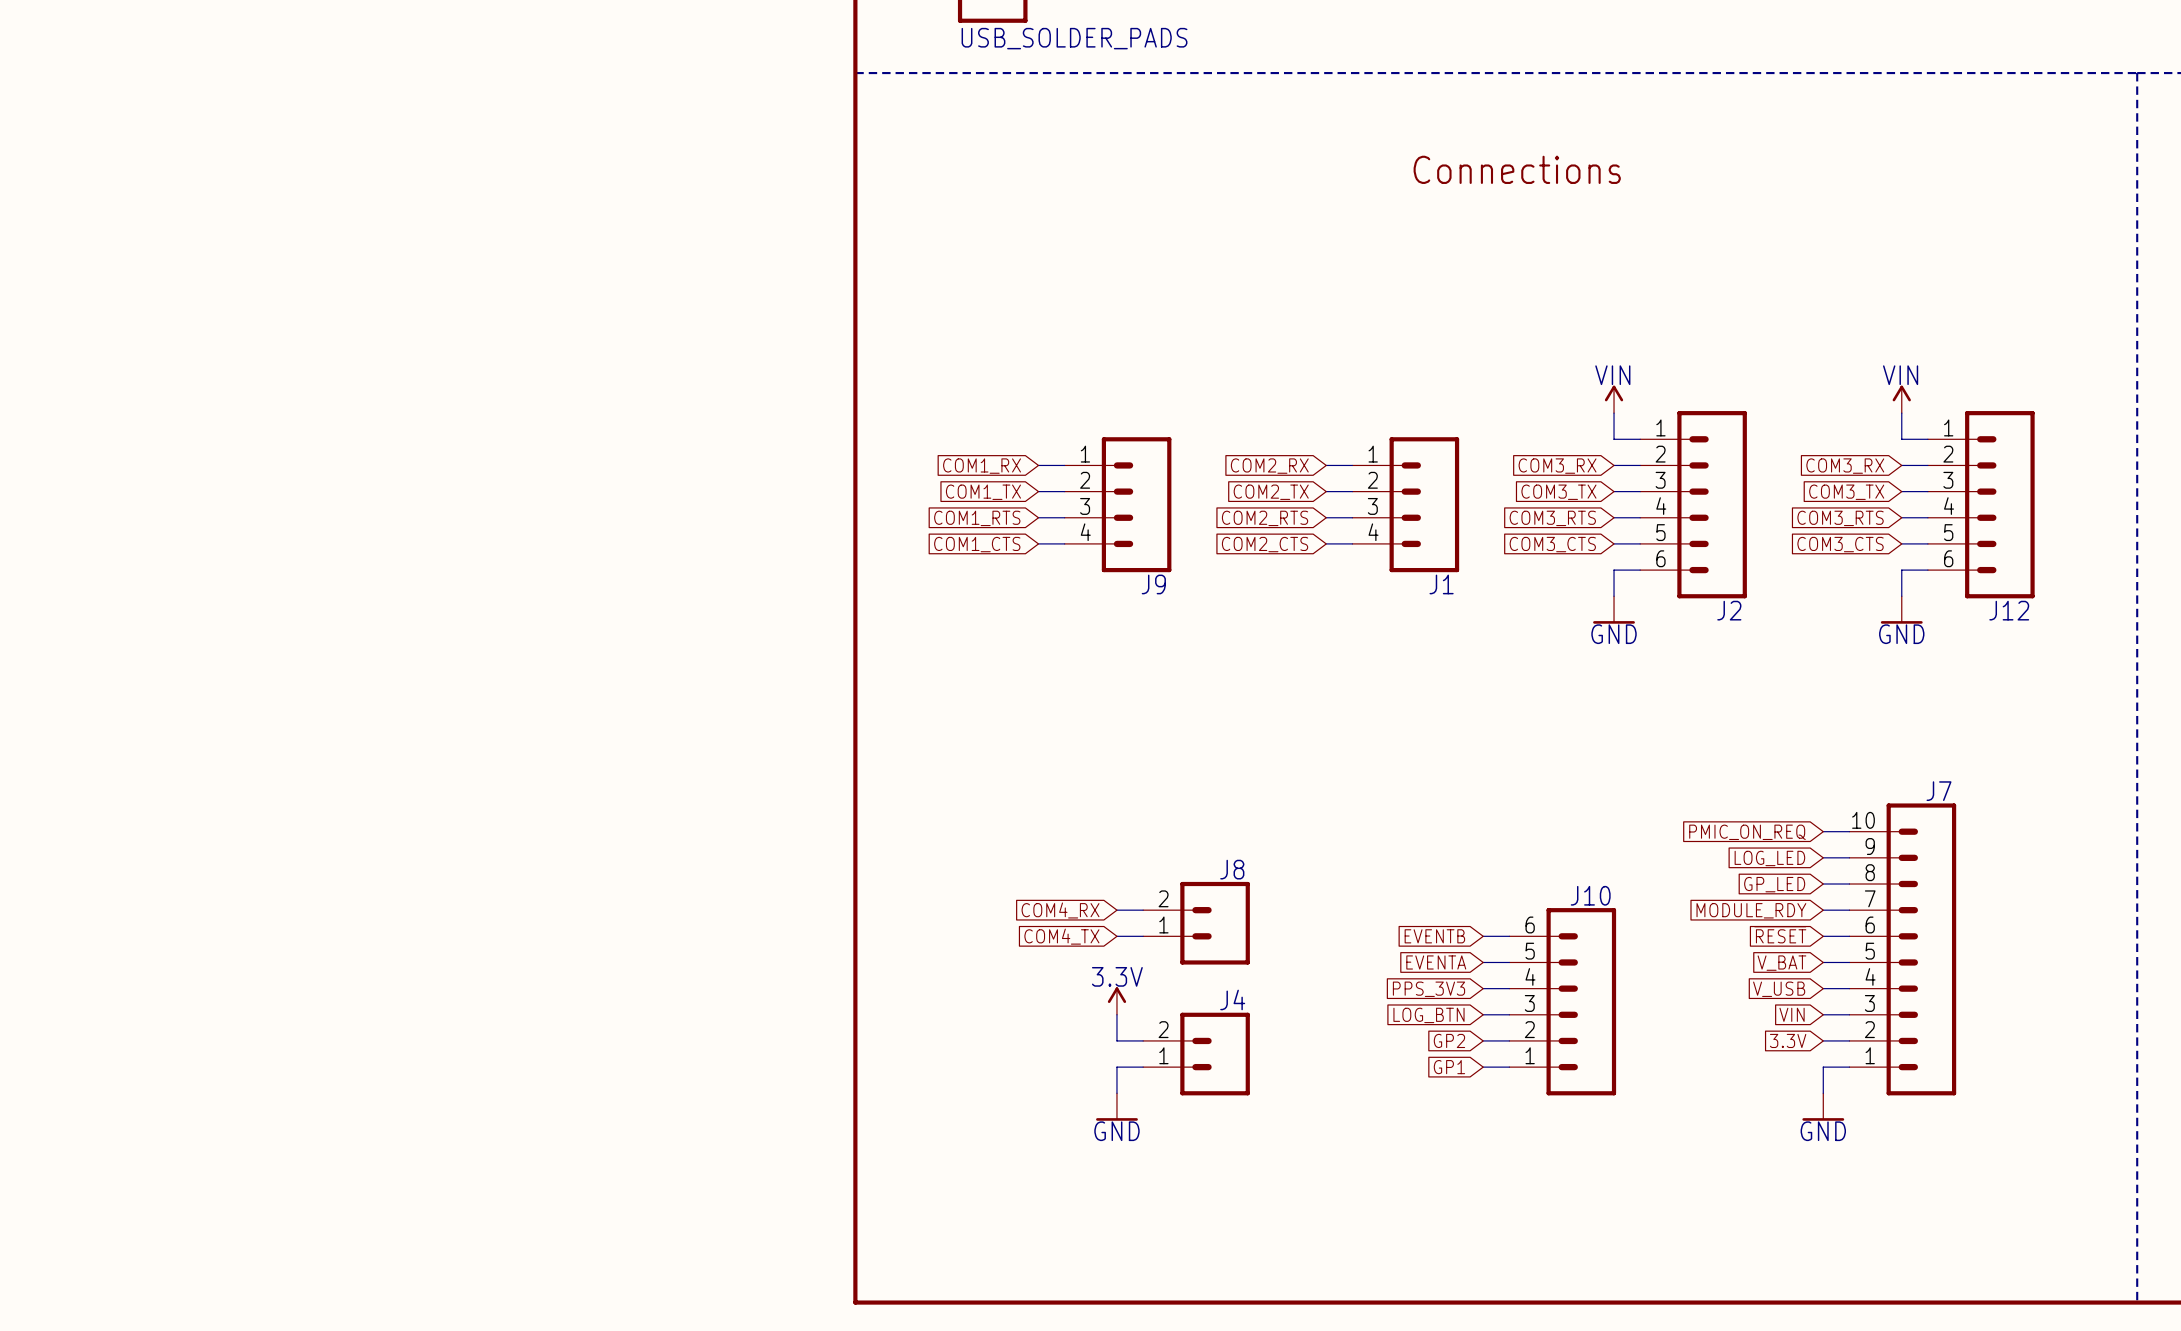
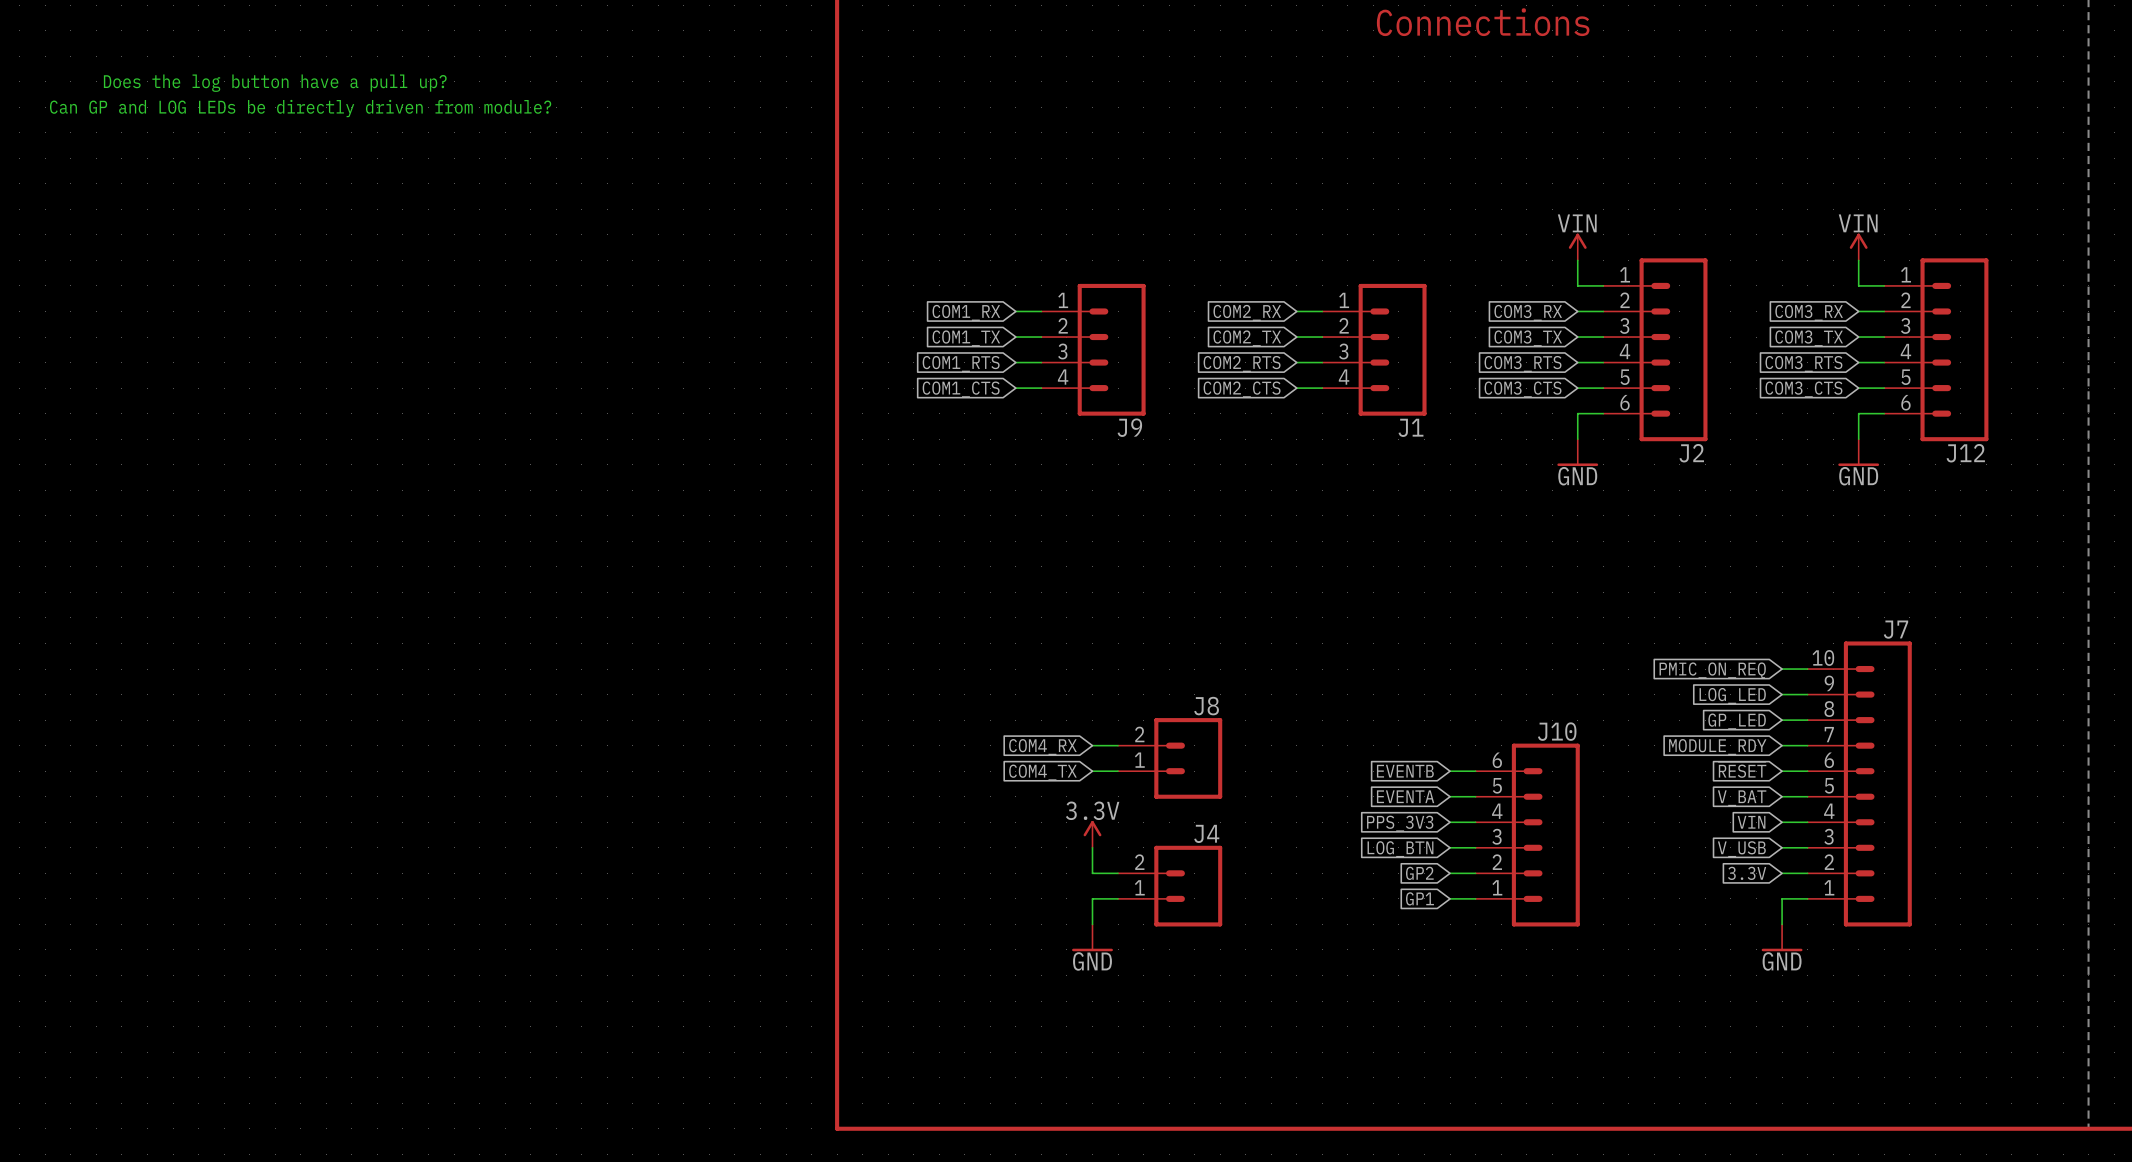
text: none -> Does the log button have a pull up? (275, 83)
text: none -> Can GP and LOG LEDs be directly driven from module? (300, 108)
global label: V_USB (1779, 989) -> VIN (1751, 822)
global label: VIN (1792, 1014) -> V_USB (1741, 849)

